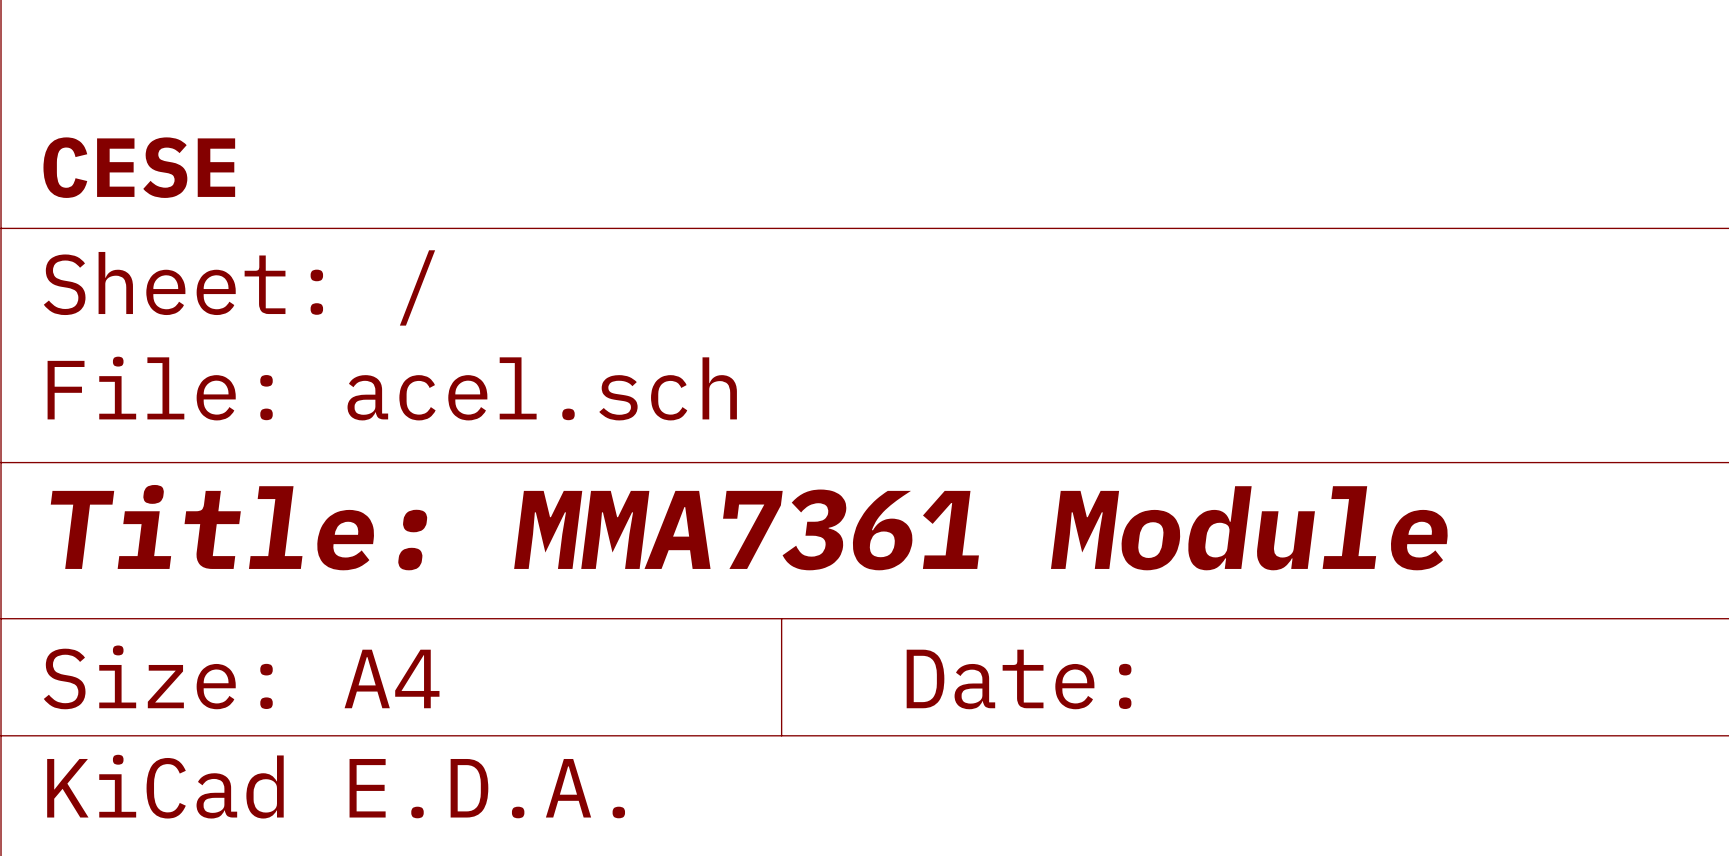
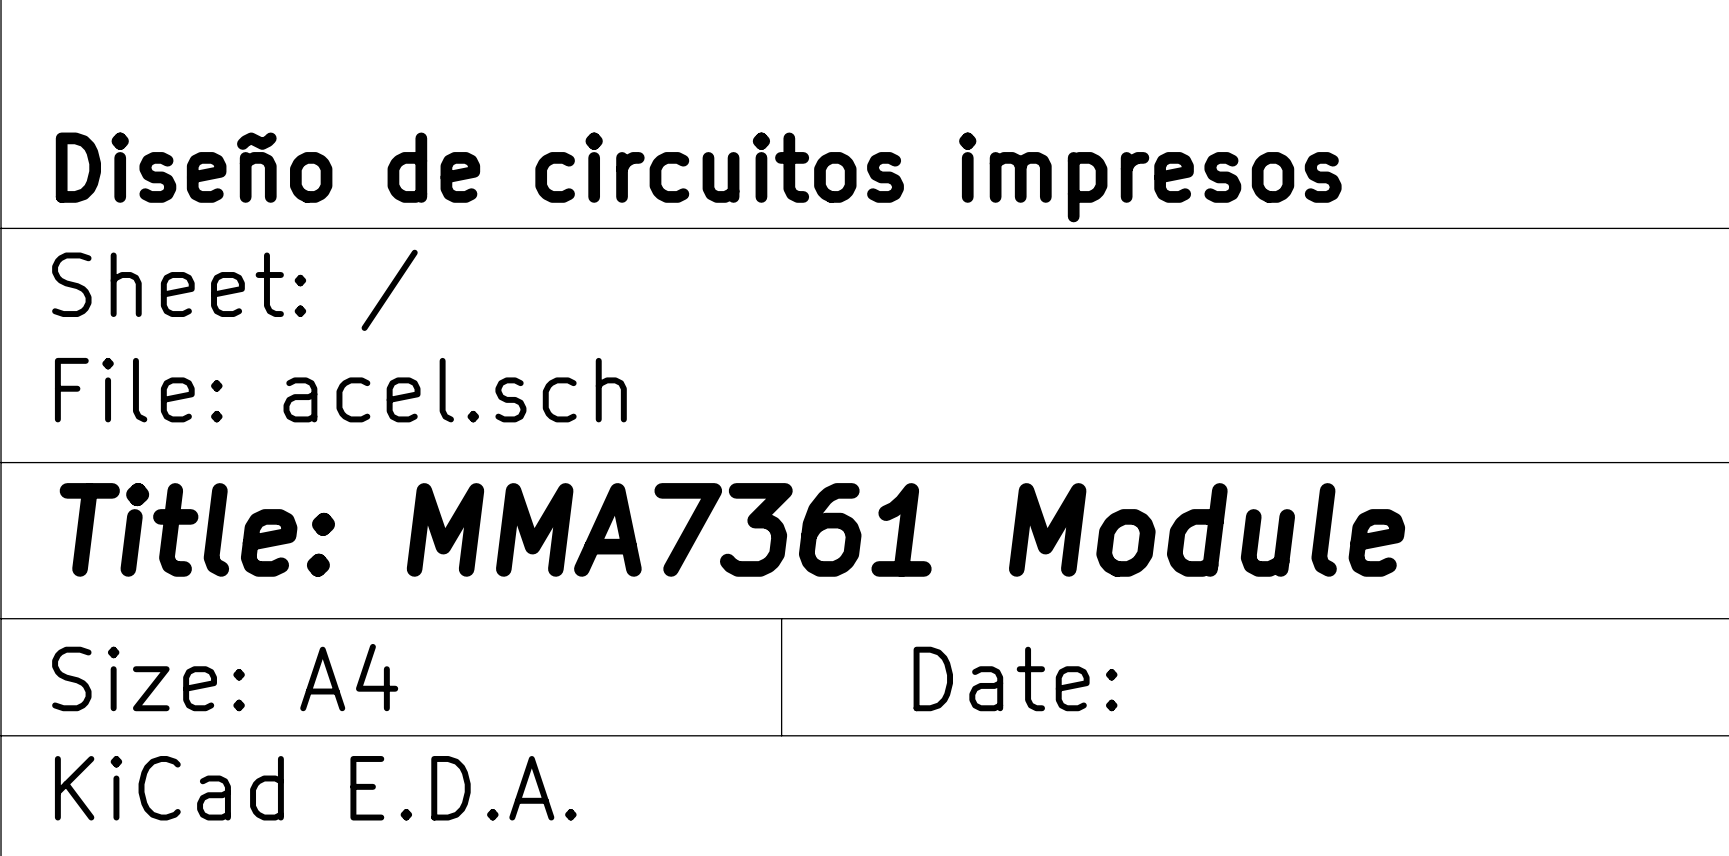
title block: CESE (139, 167) -> Diseño de circuitos impresos (698, 177)

